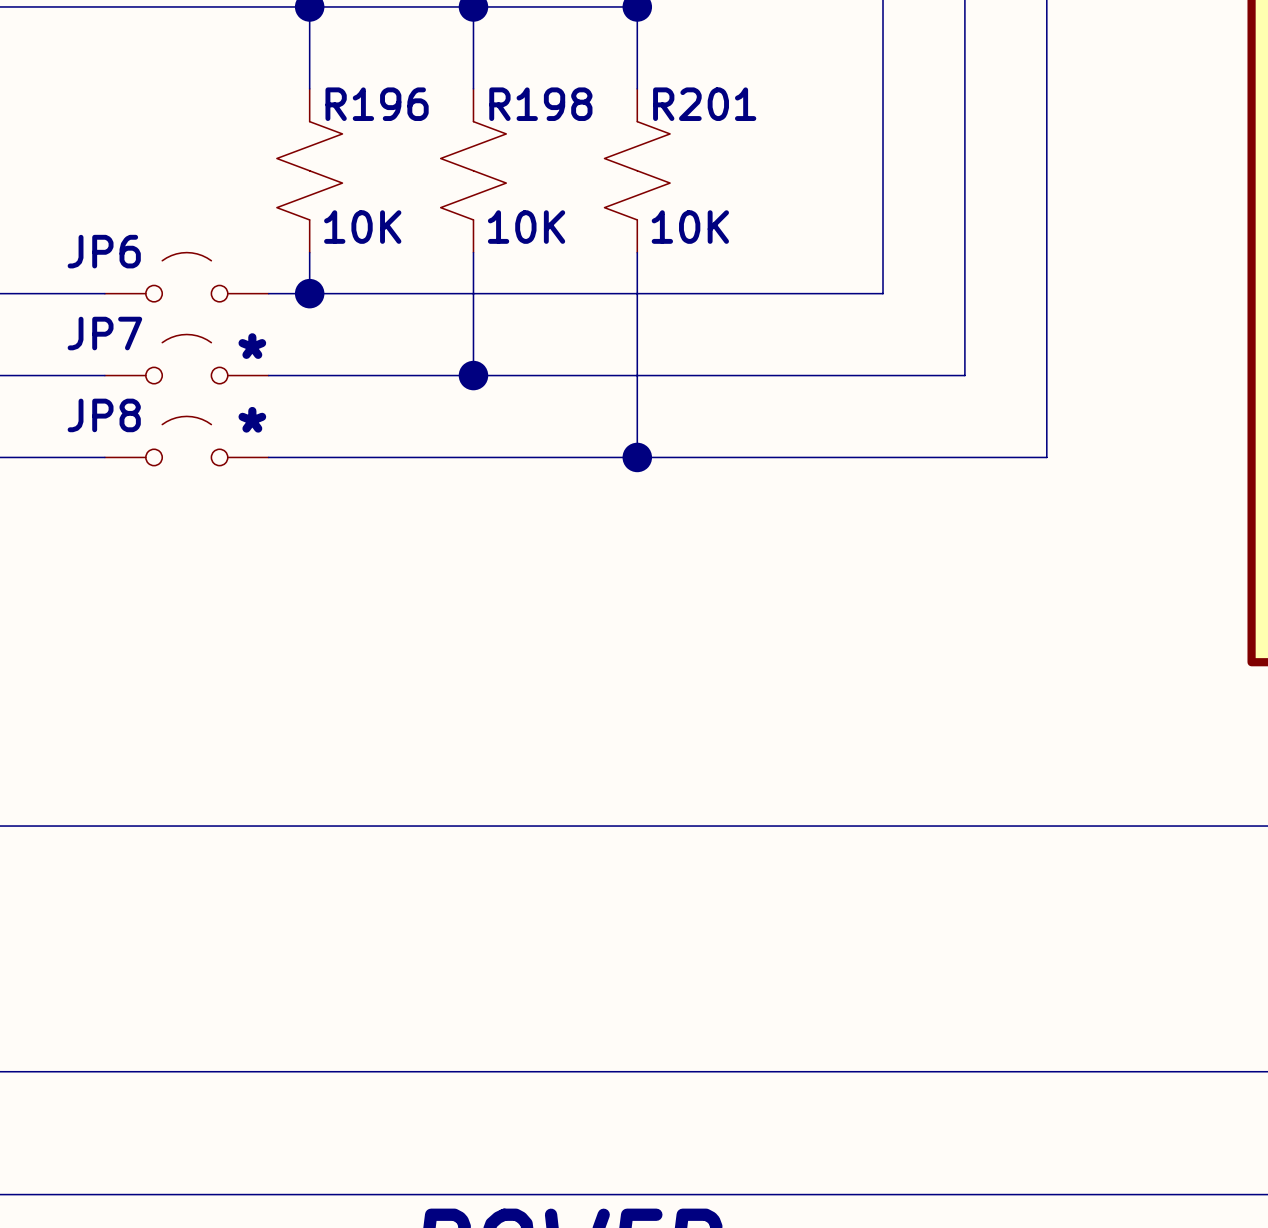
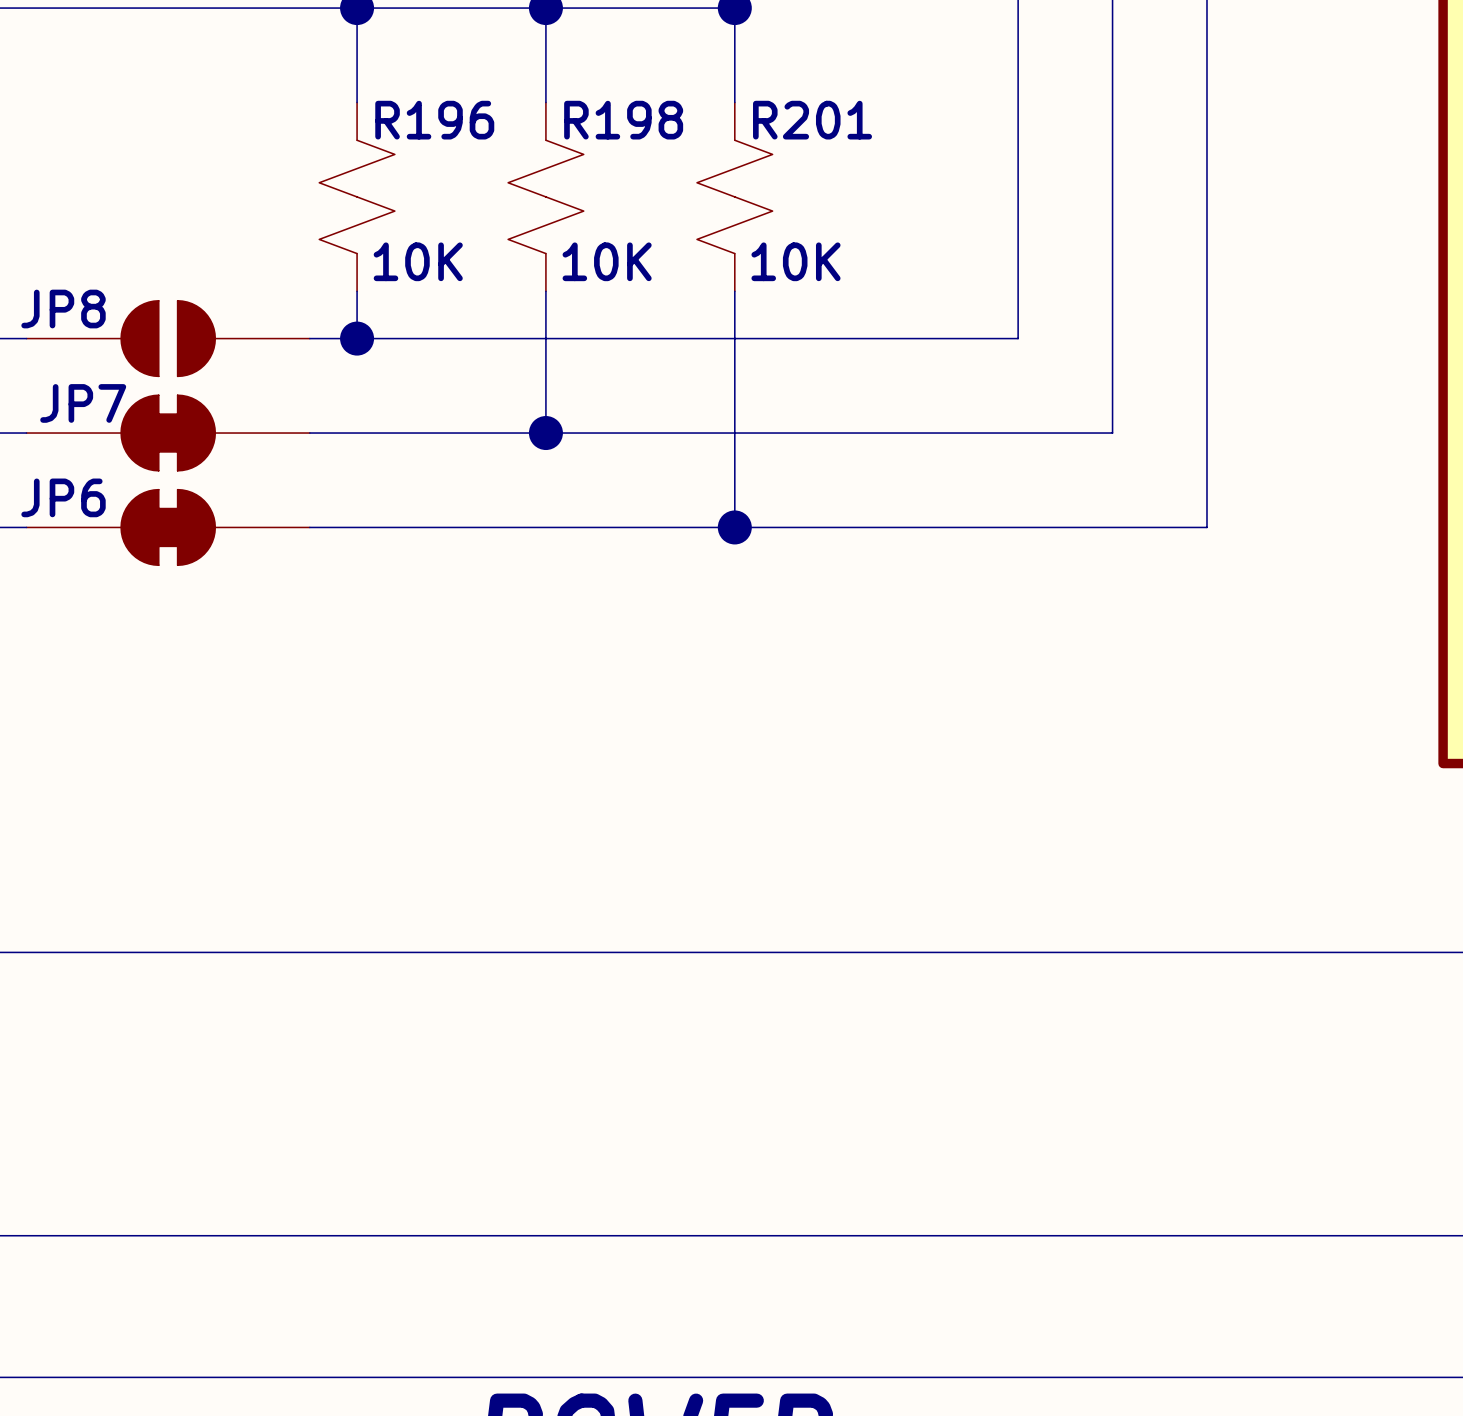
JP6 symbol: [104, 252, 269, 302] -> [26, 489, 310, 566]
JP7 symbol: [104, 334, 269, 384] -> [26, 395, 310, 471]
text: * (252, 346) -> none
JP8 symbol: [104, 416, 269, 466] -> [26, 300, 310, 377]
text: * (252, 419) -> none

